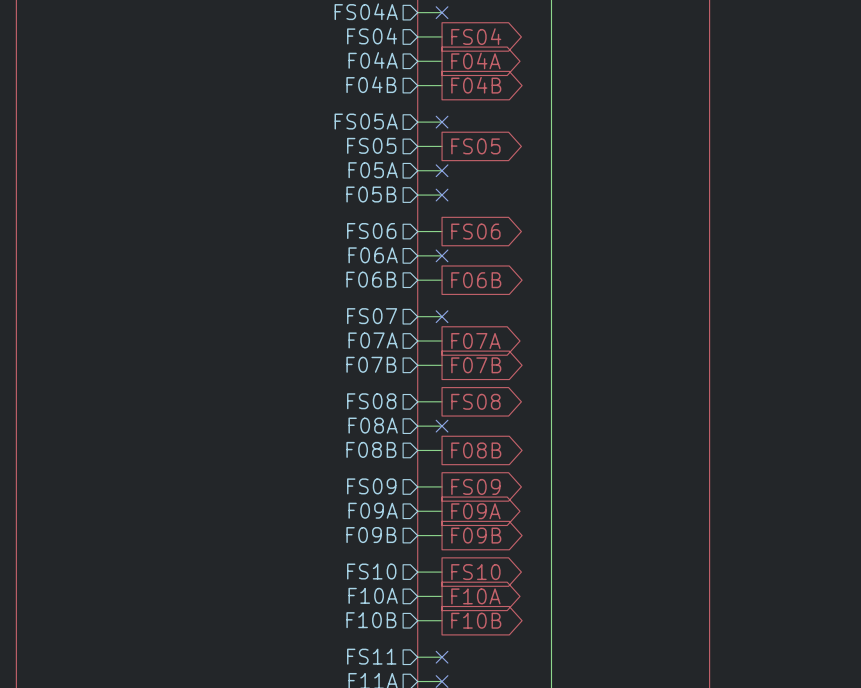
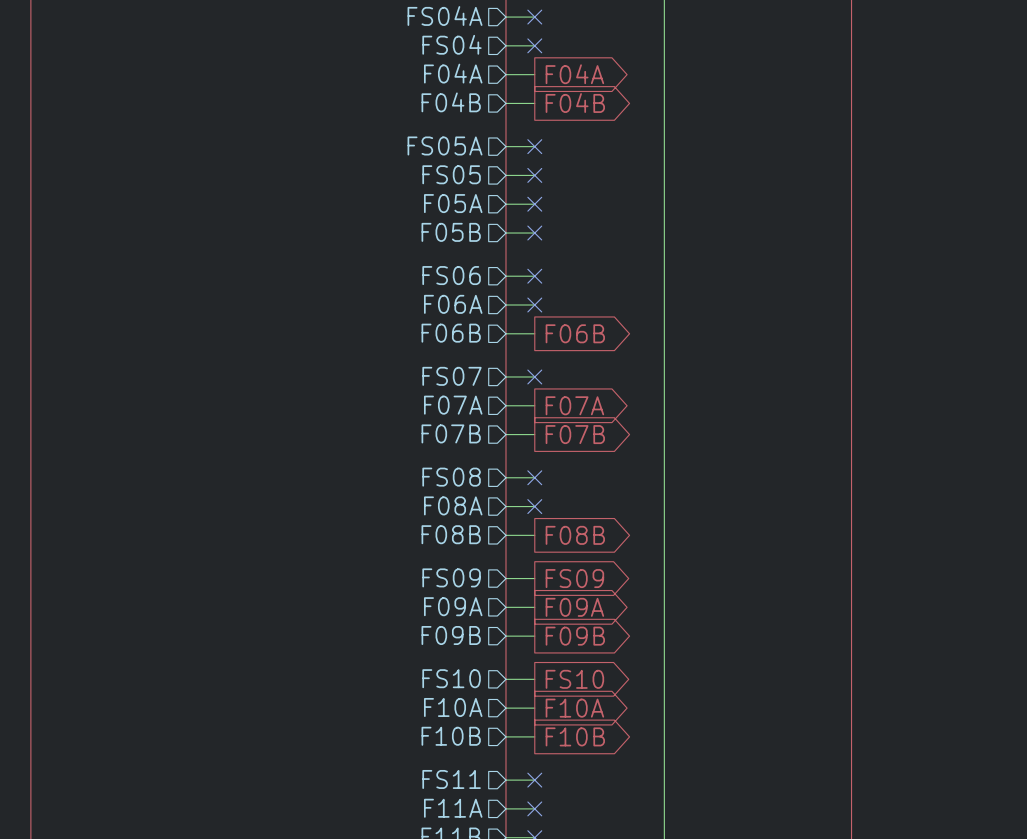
no-connect mark: none -> (534, 45)
global label: FS04 (476, 36) -> none
no-connect mark: none -> (534, 175)
global label: FS05 (475, 146) -> none
no-connect mark: none -> (534, 276)
global label: FS06 (475, 231) -> none
no-connect mark: none -> (534, 477)
global label: FS08 (475, 401) -> none

